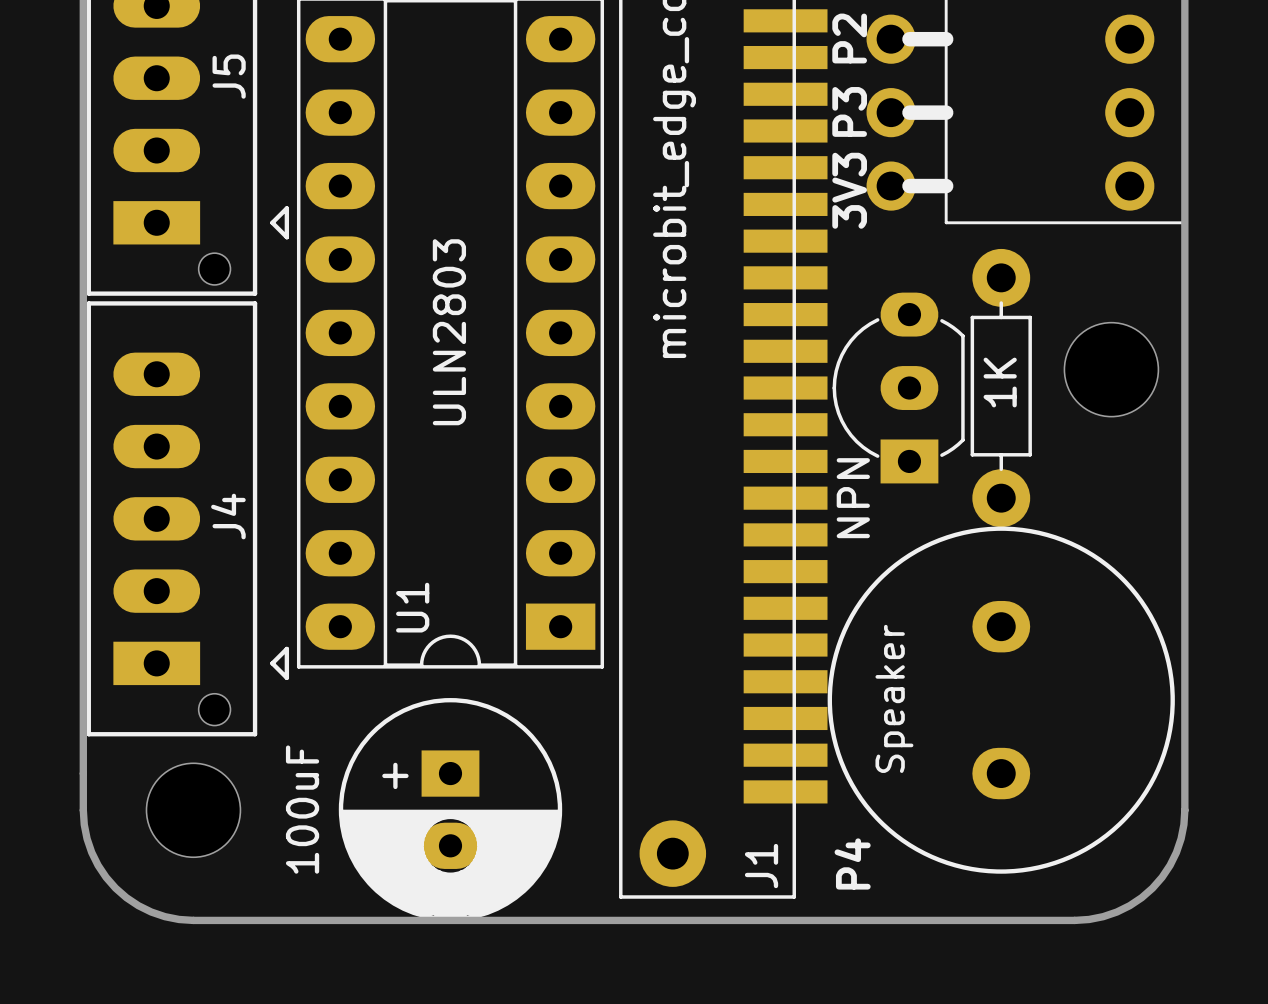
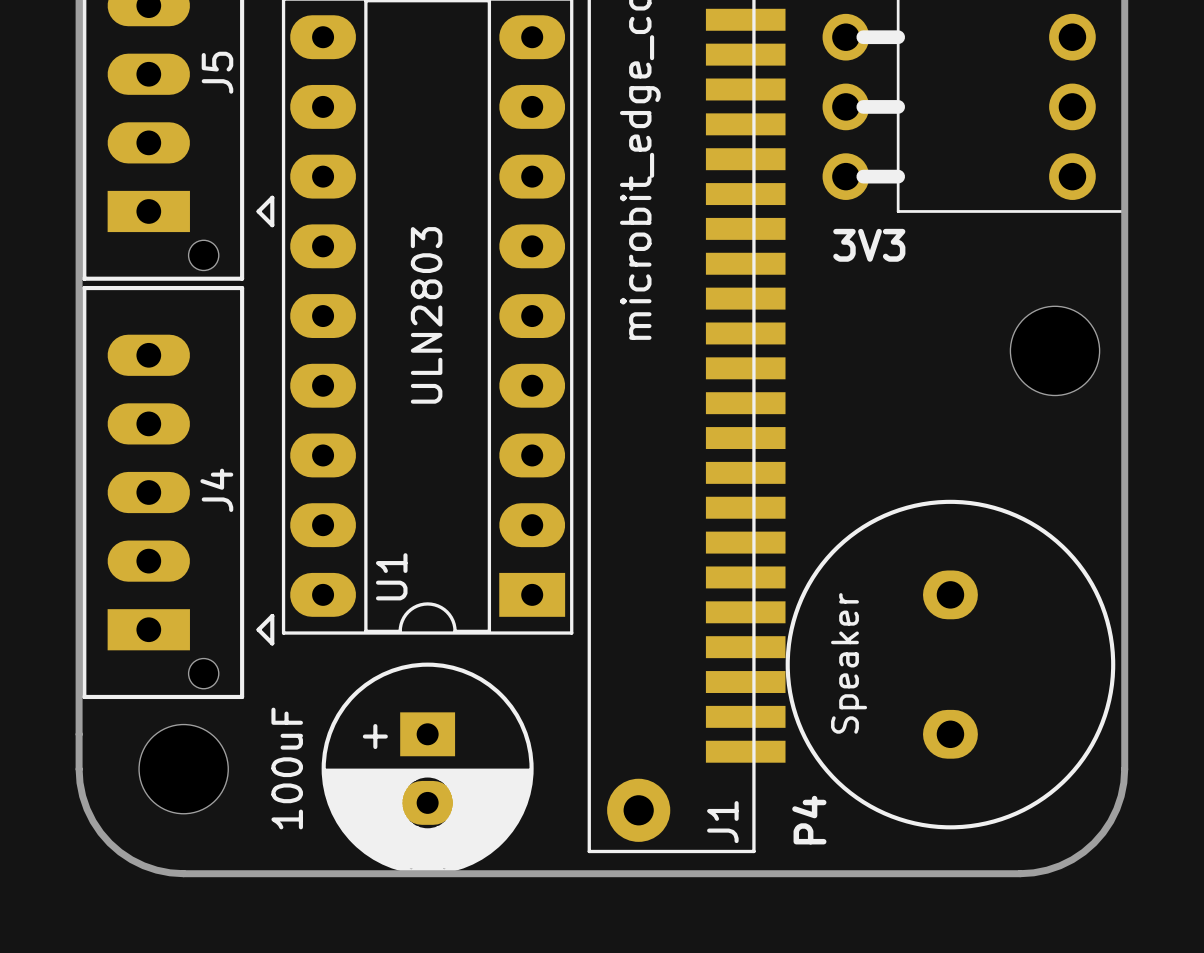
text: P2 (849, 38) -> none
text: P3 (849, 111) -> none
text rotation: 0° (849, 190) -> 90° clockwise (869, 245)
text position: 3V3 (849, 190) -> 3V3 (869, 245)
part: NPN (898, 388) -> none
part: 1K (1001, 388) -> none

